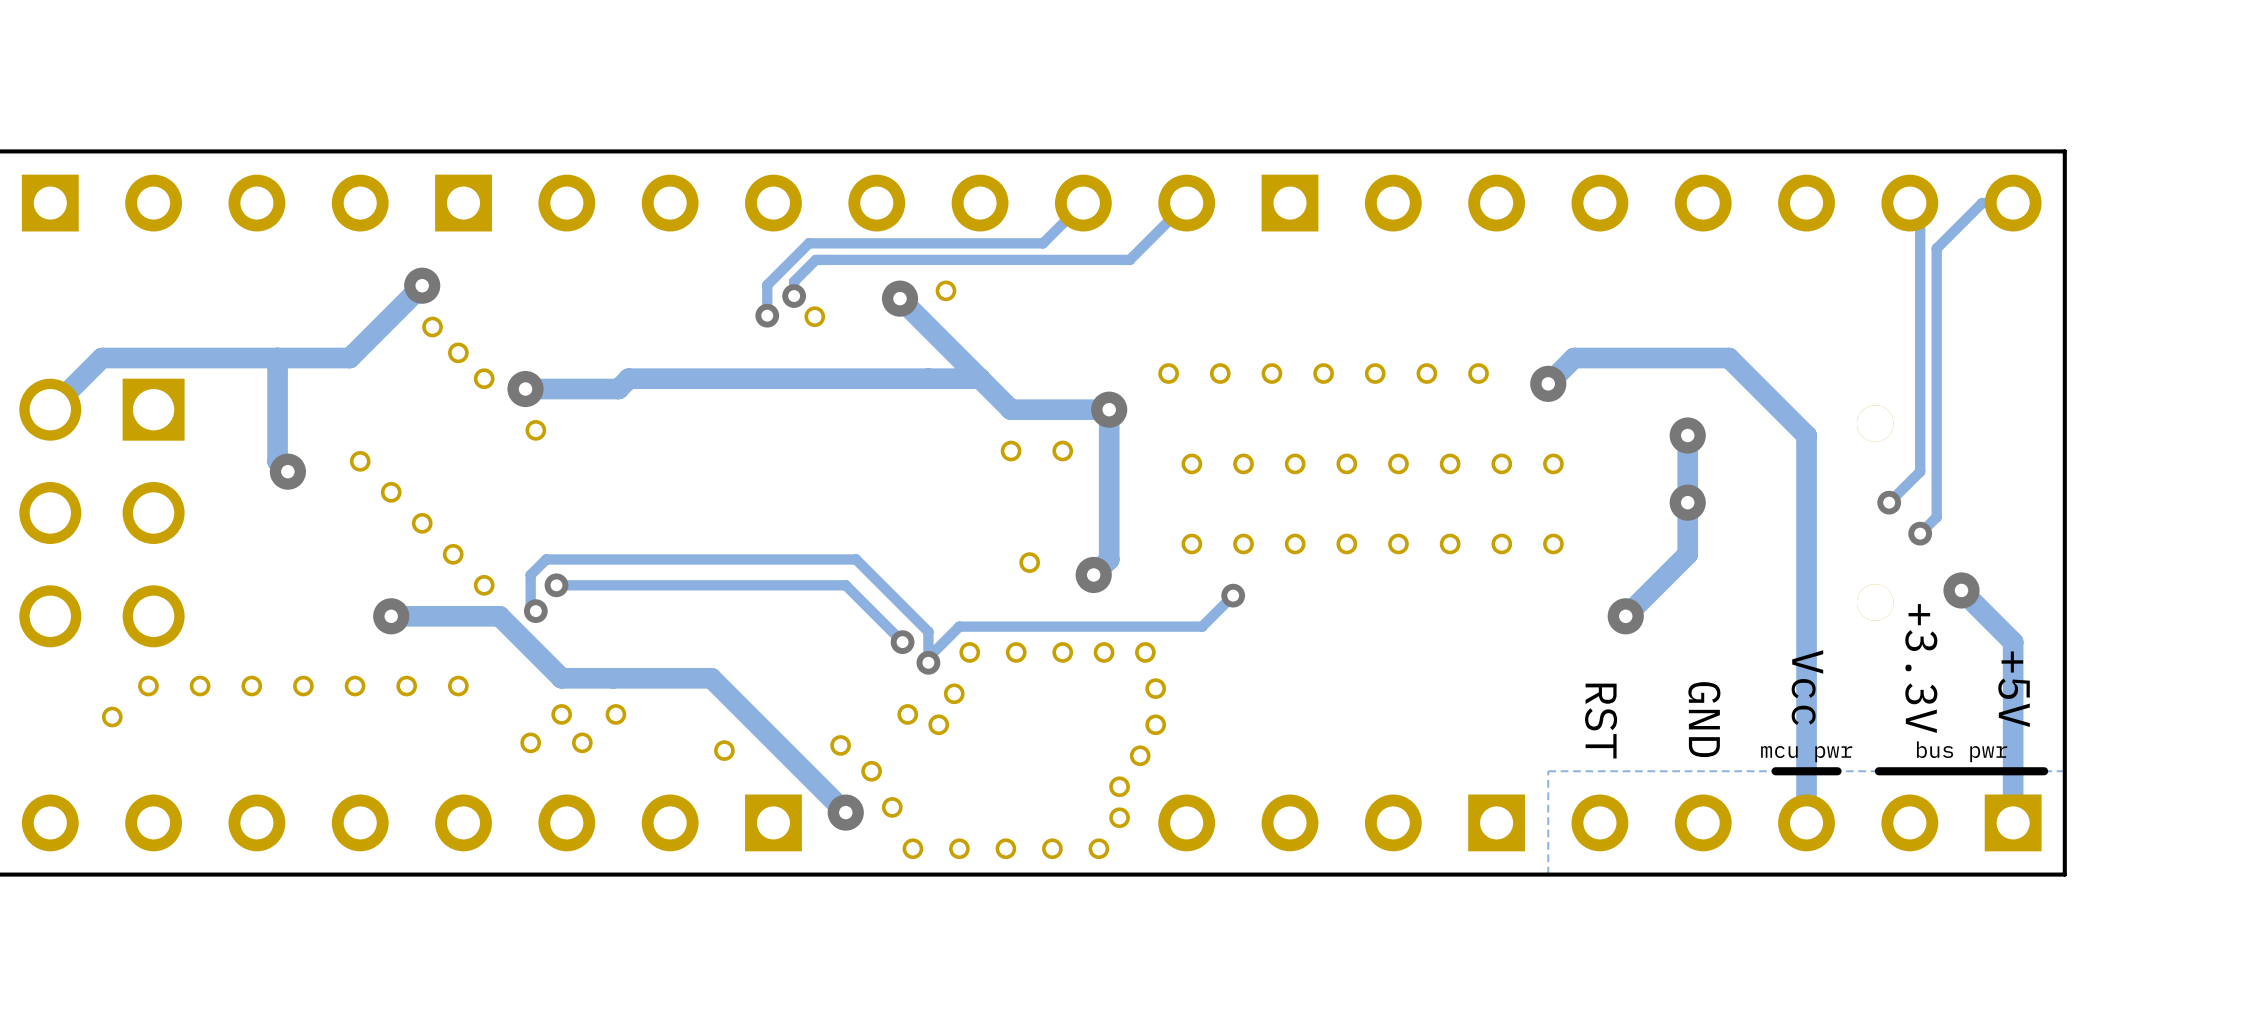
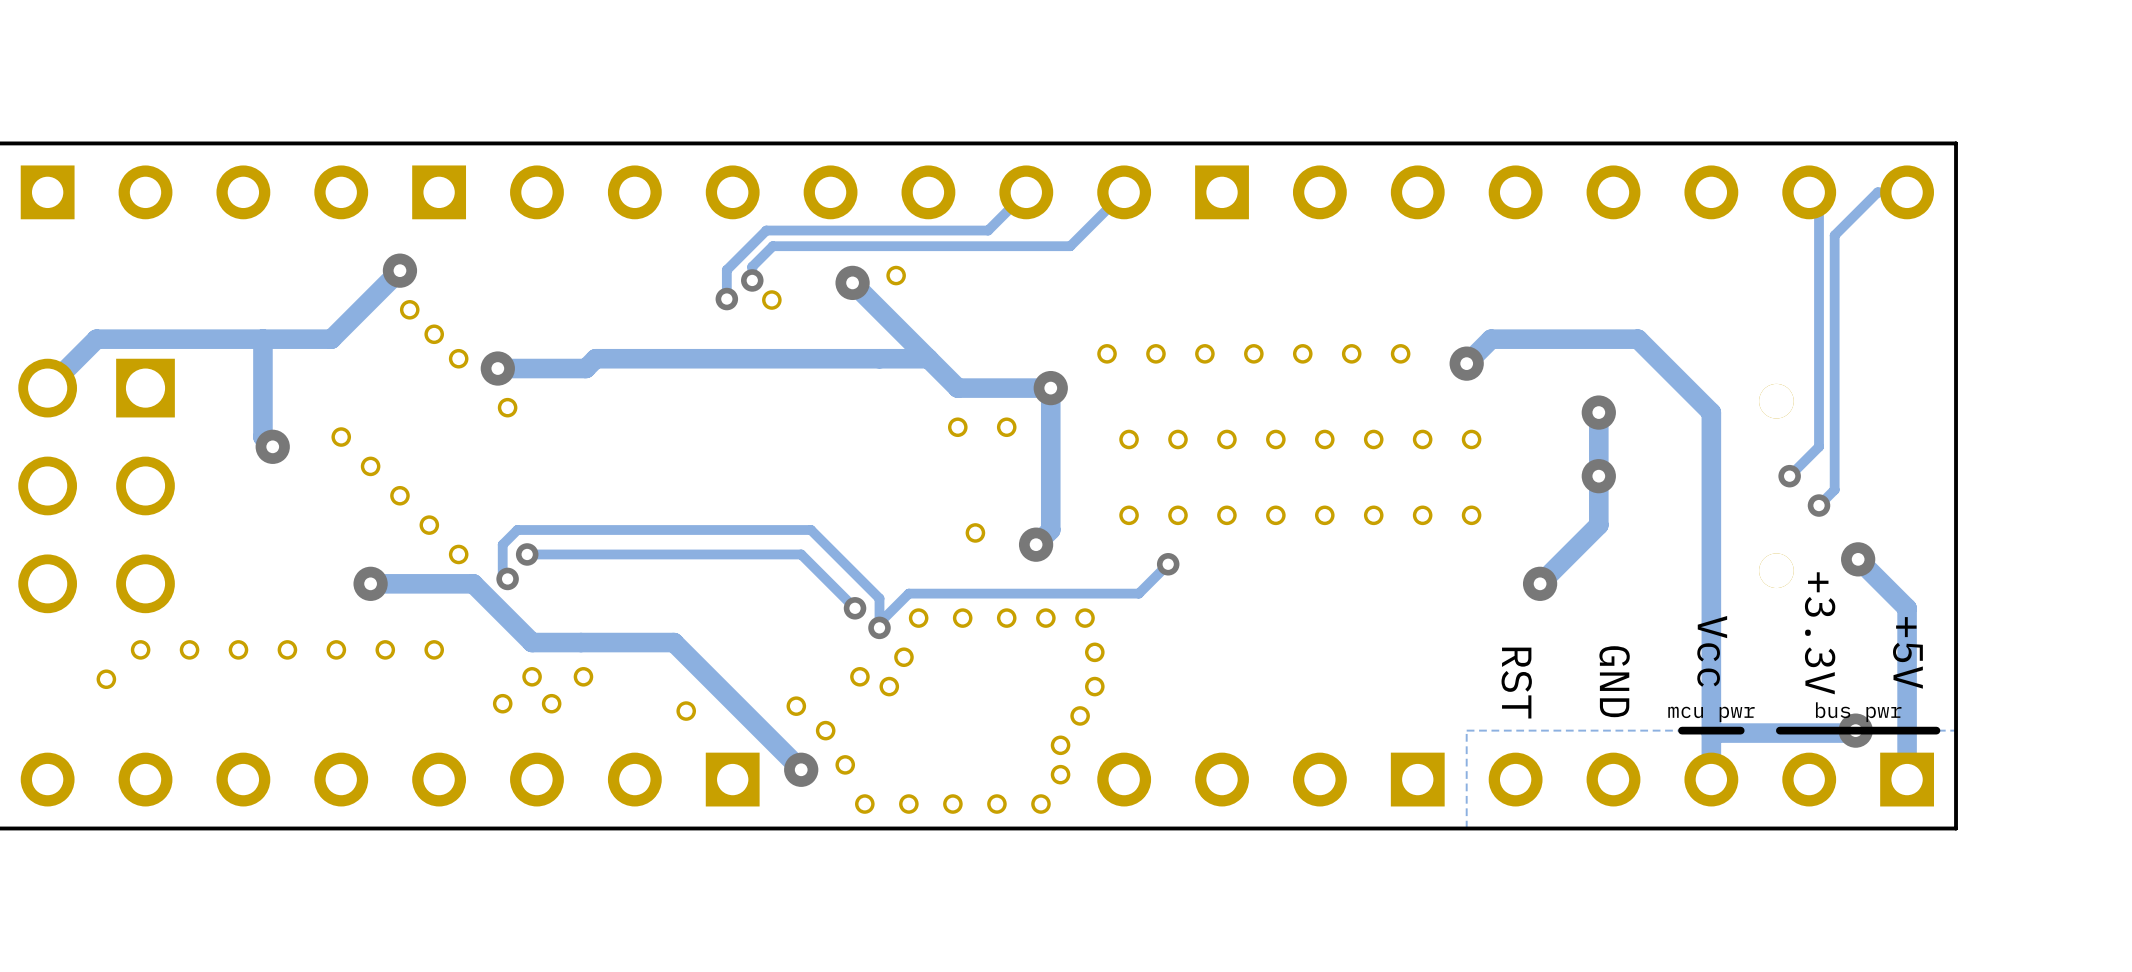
track: none -> (1855, 730) (1853, 733) (1711, 733)
via: none -> (1855, 730)

